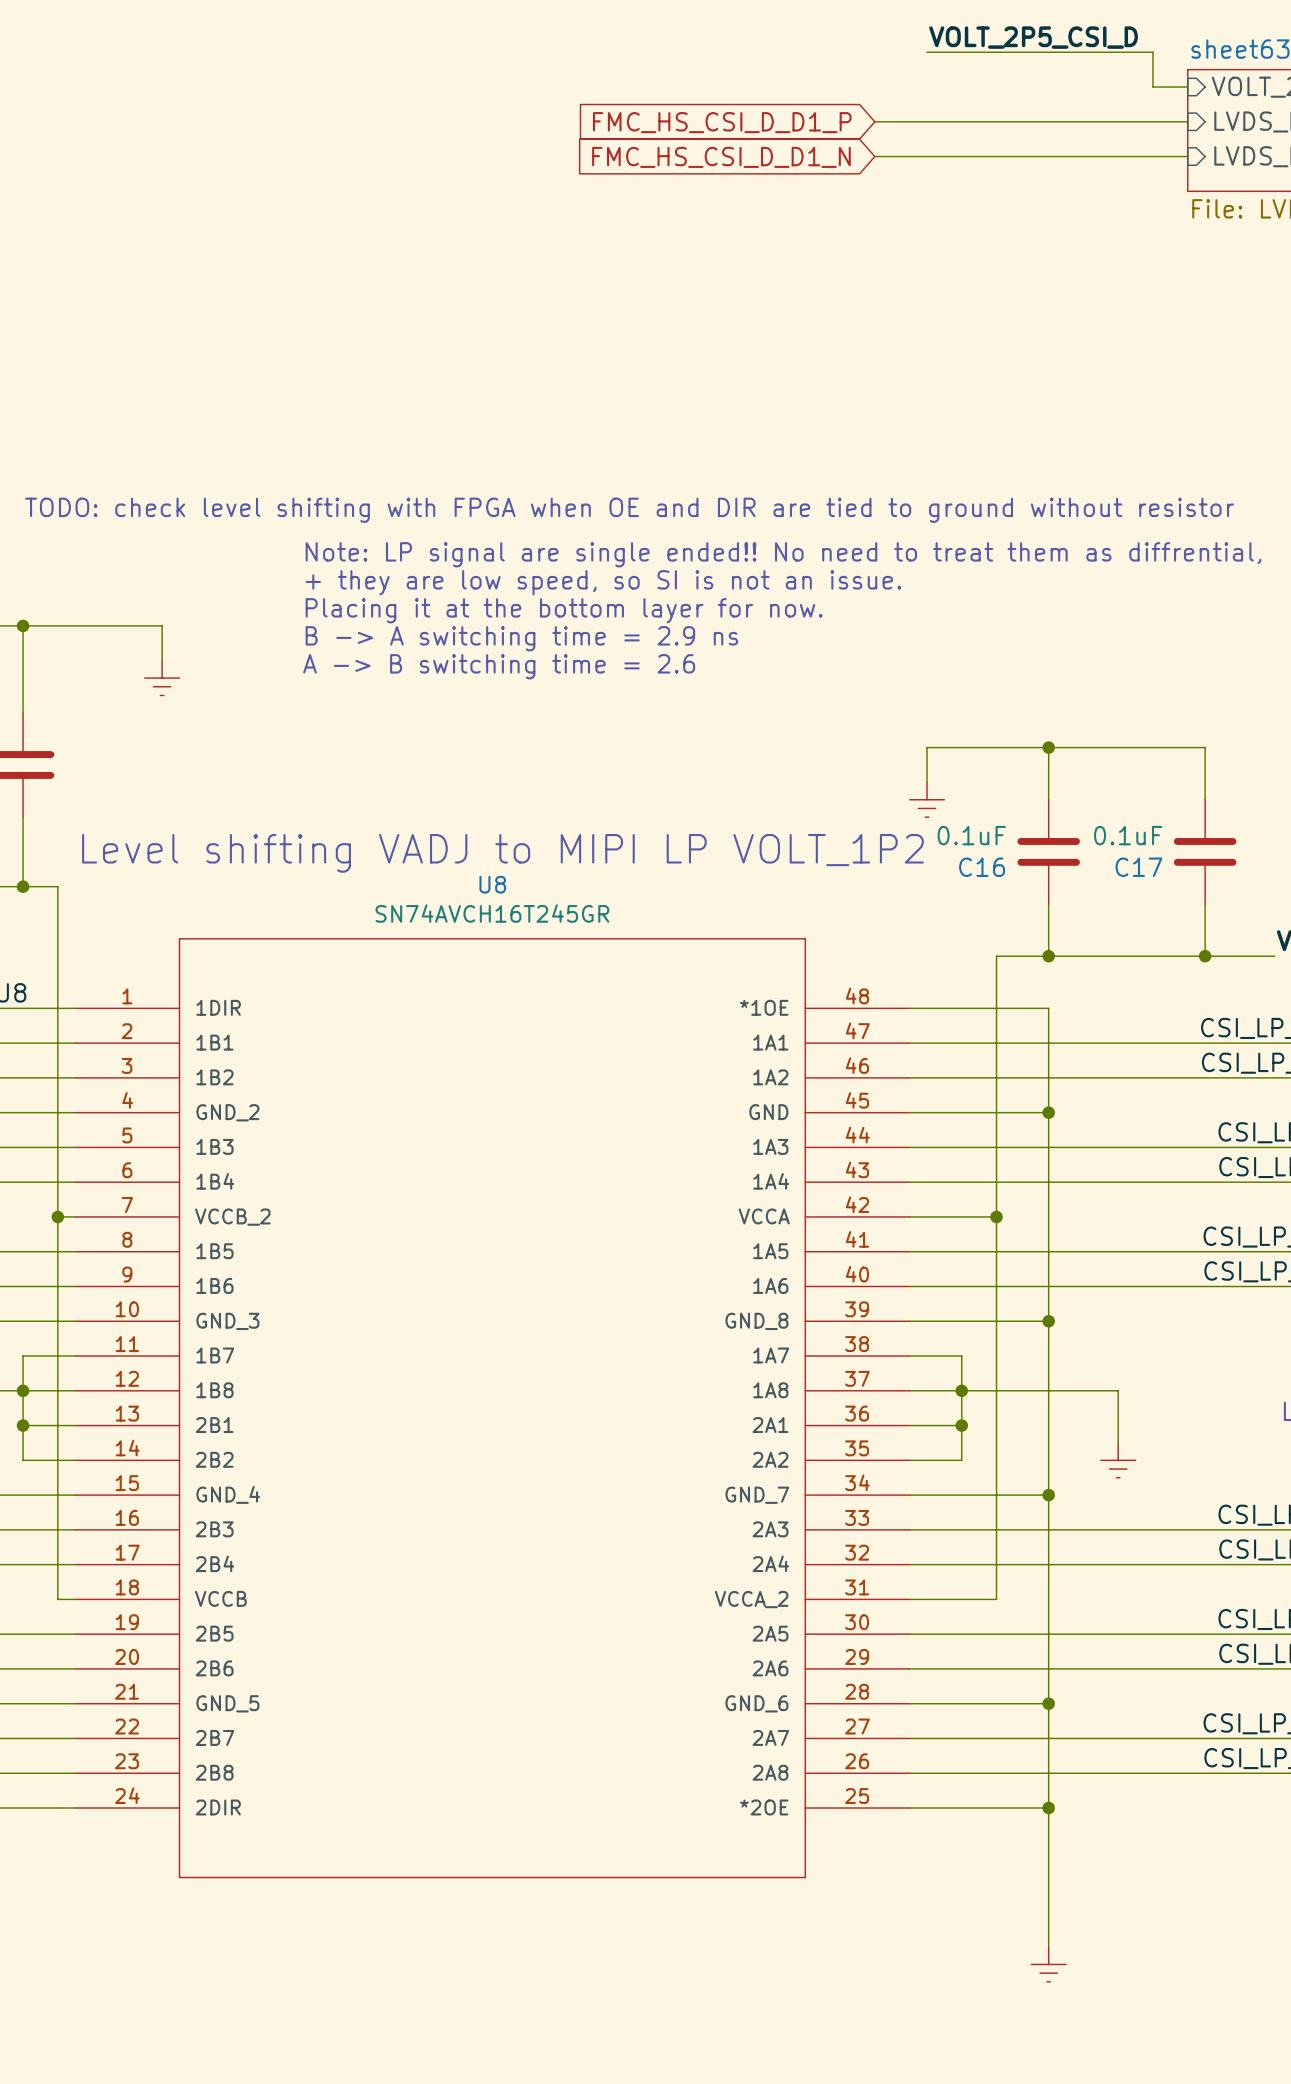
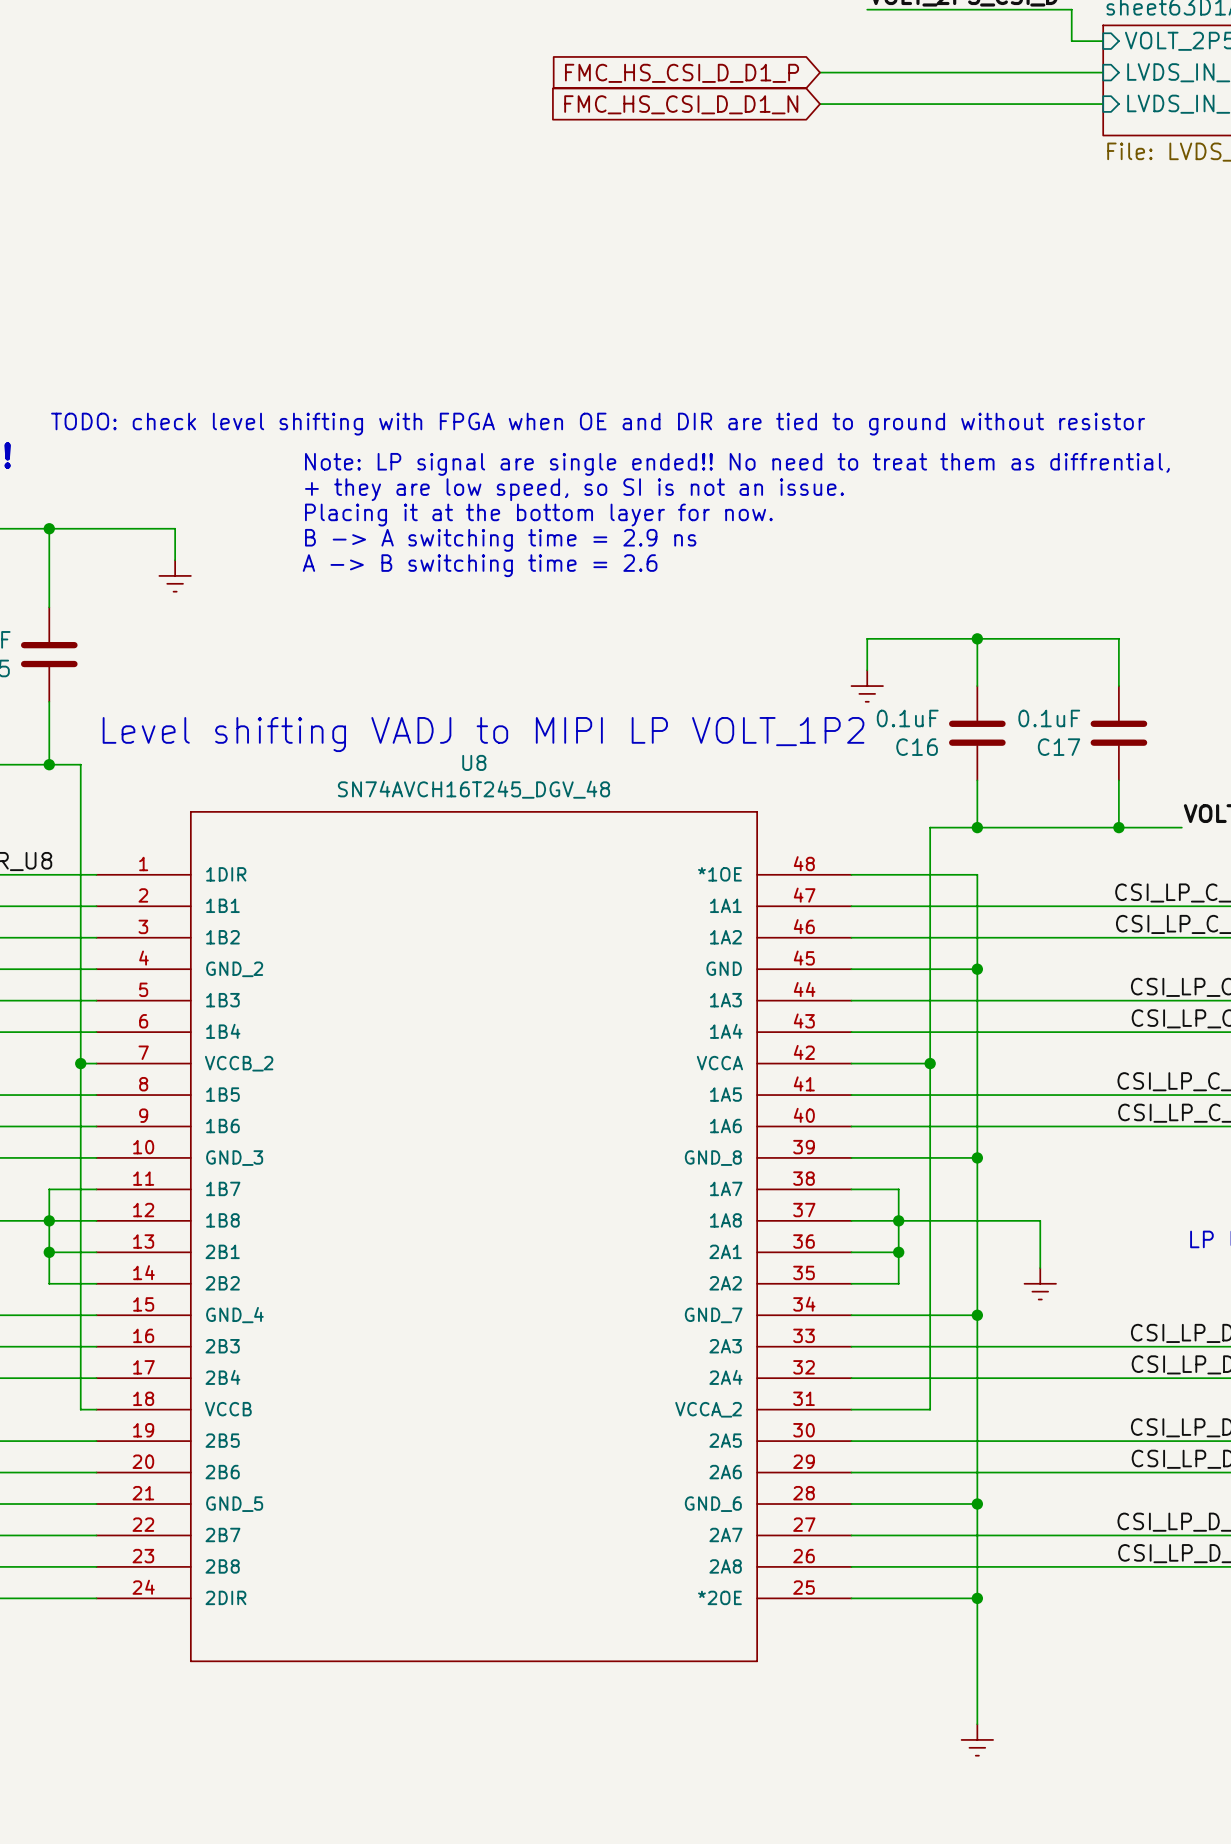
U8 value: SN74AVCH16T245GR (492, 913) -> SN74AVCH16T245_DGV_48 (473, 789)

